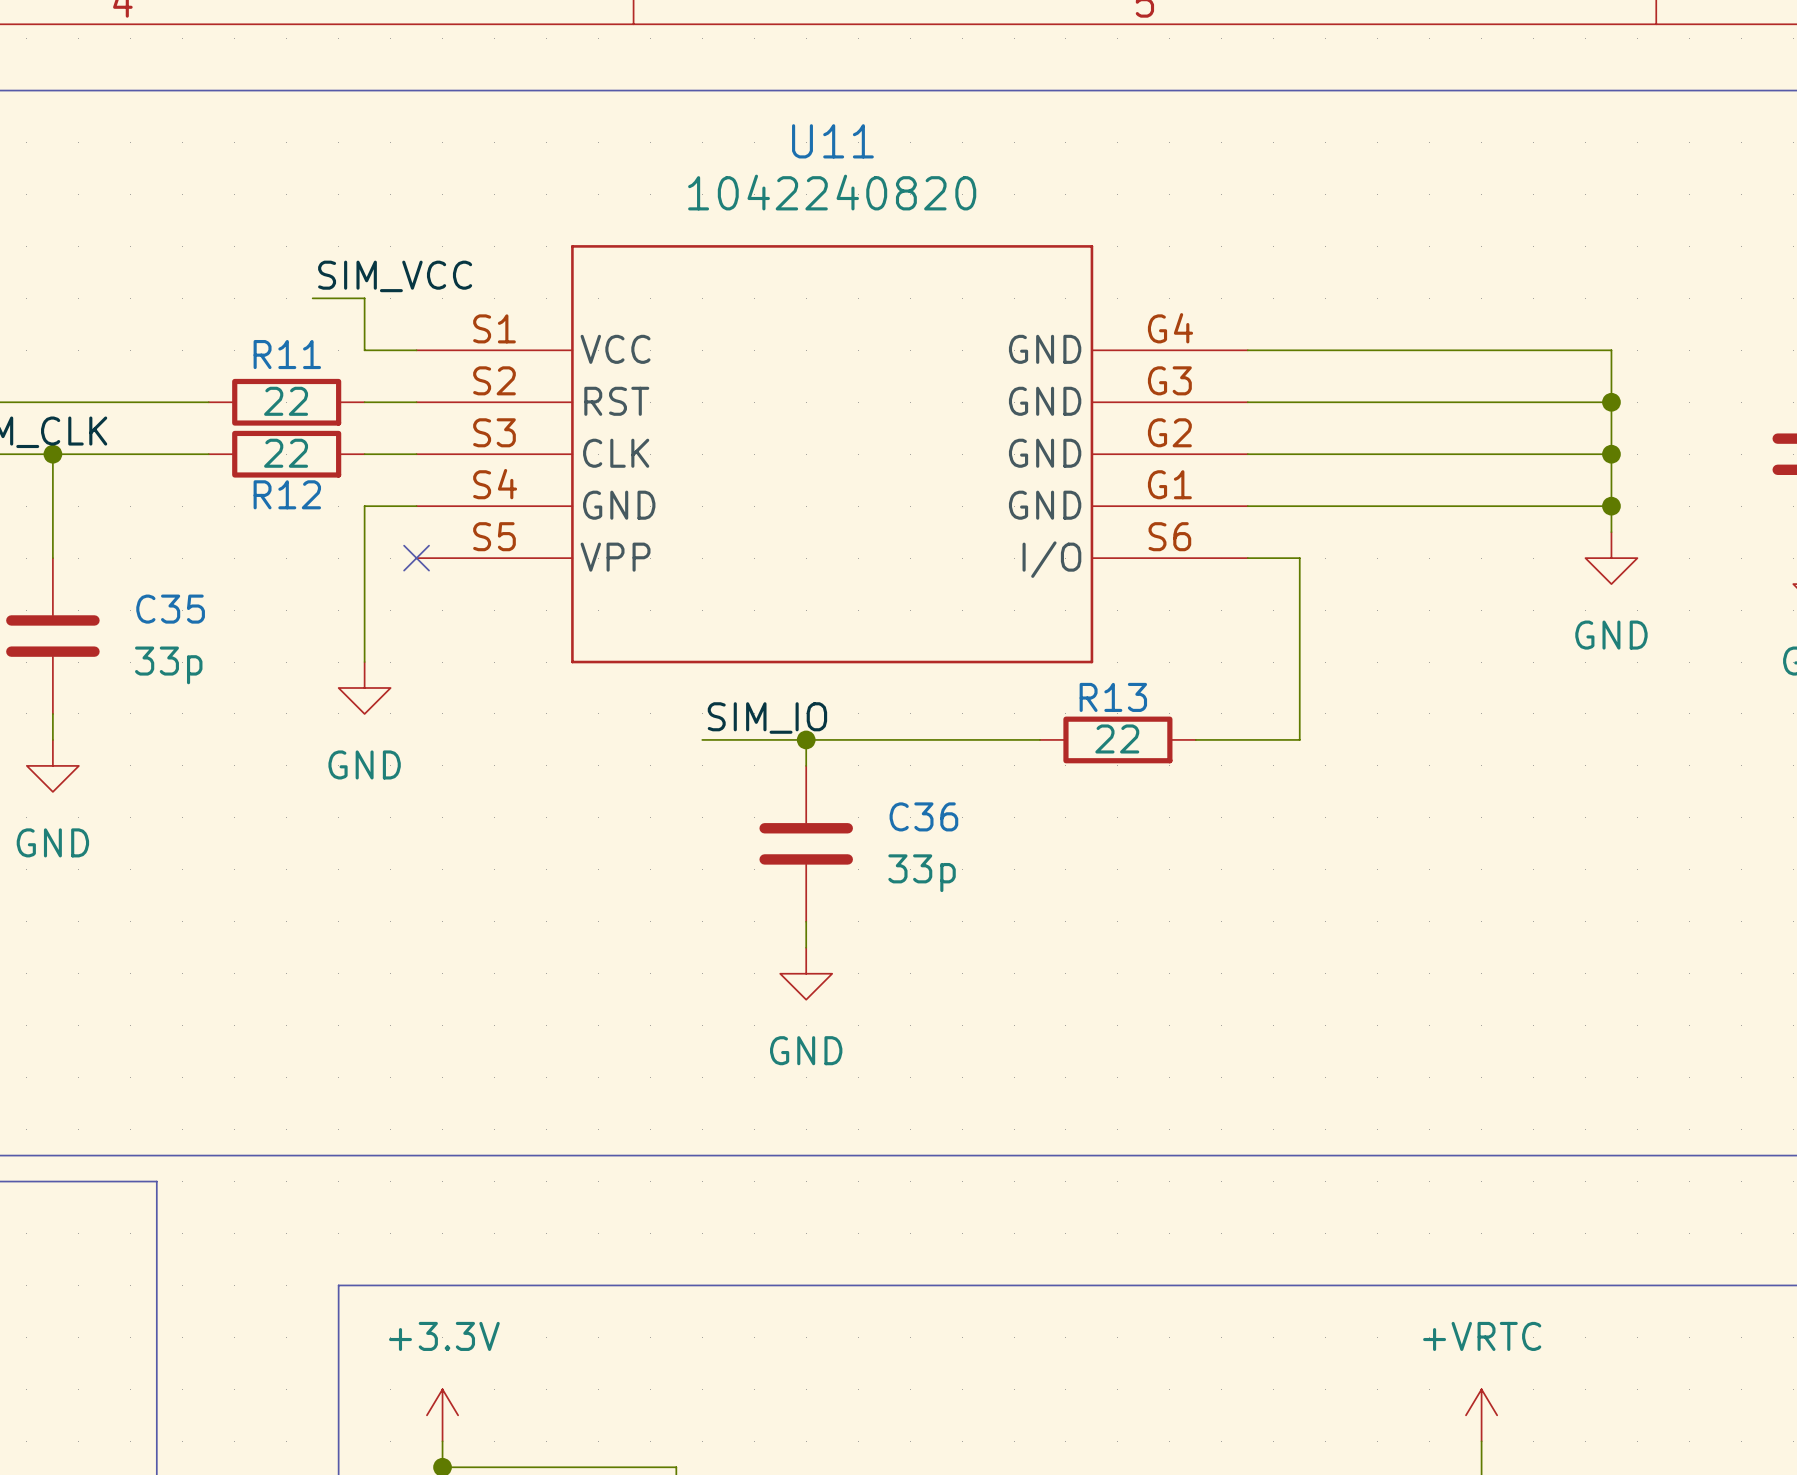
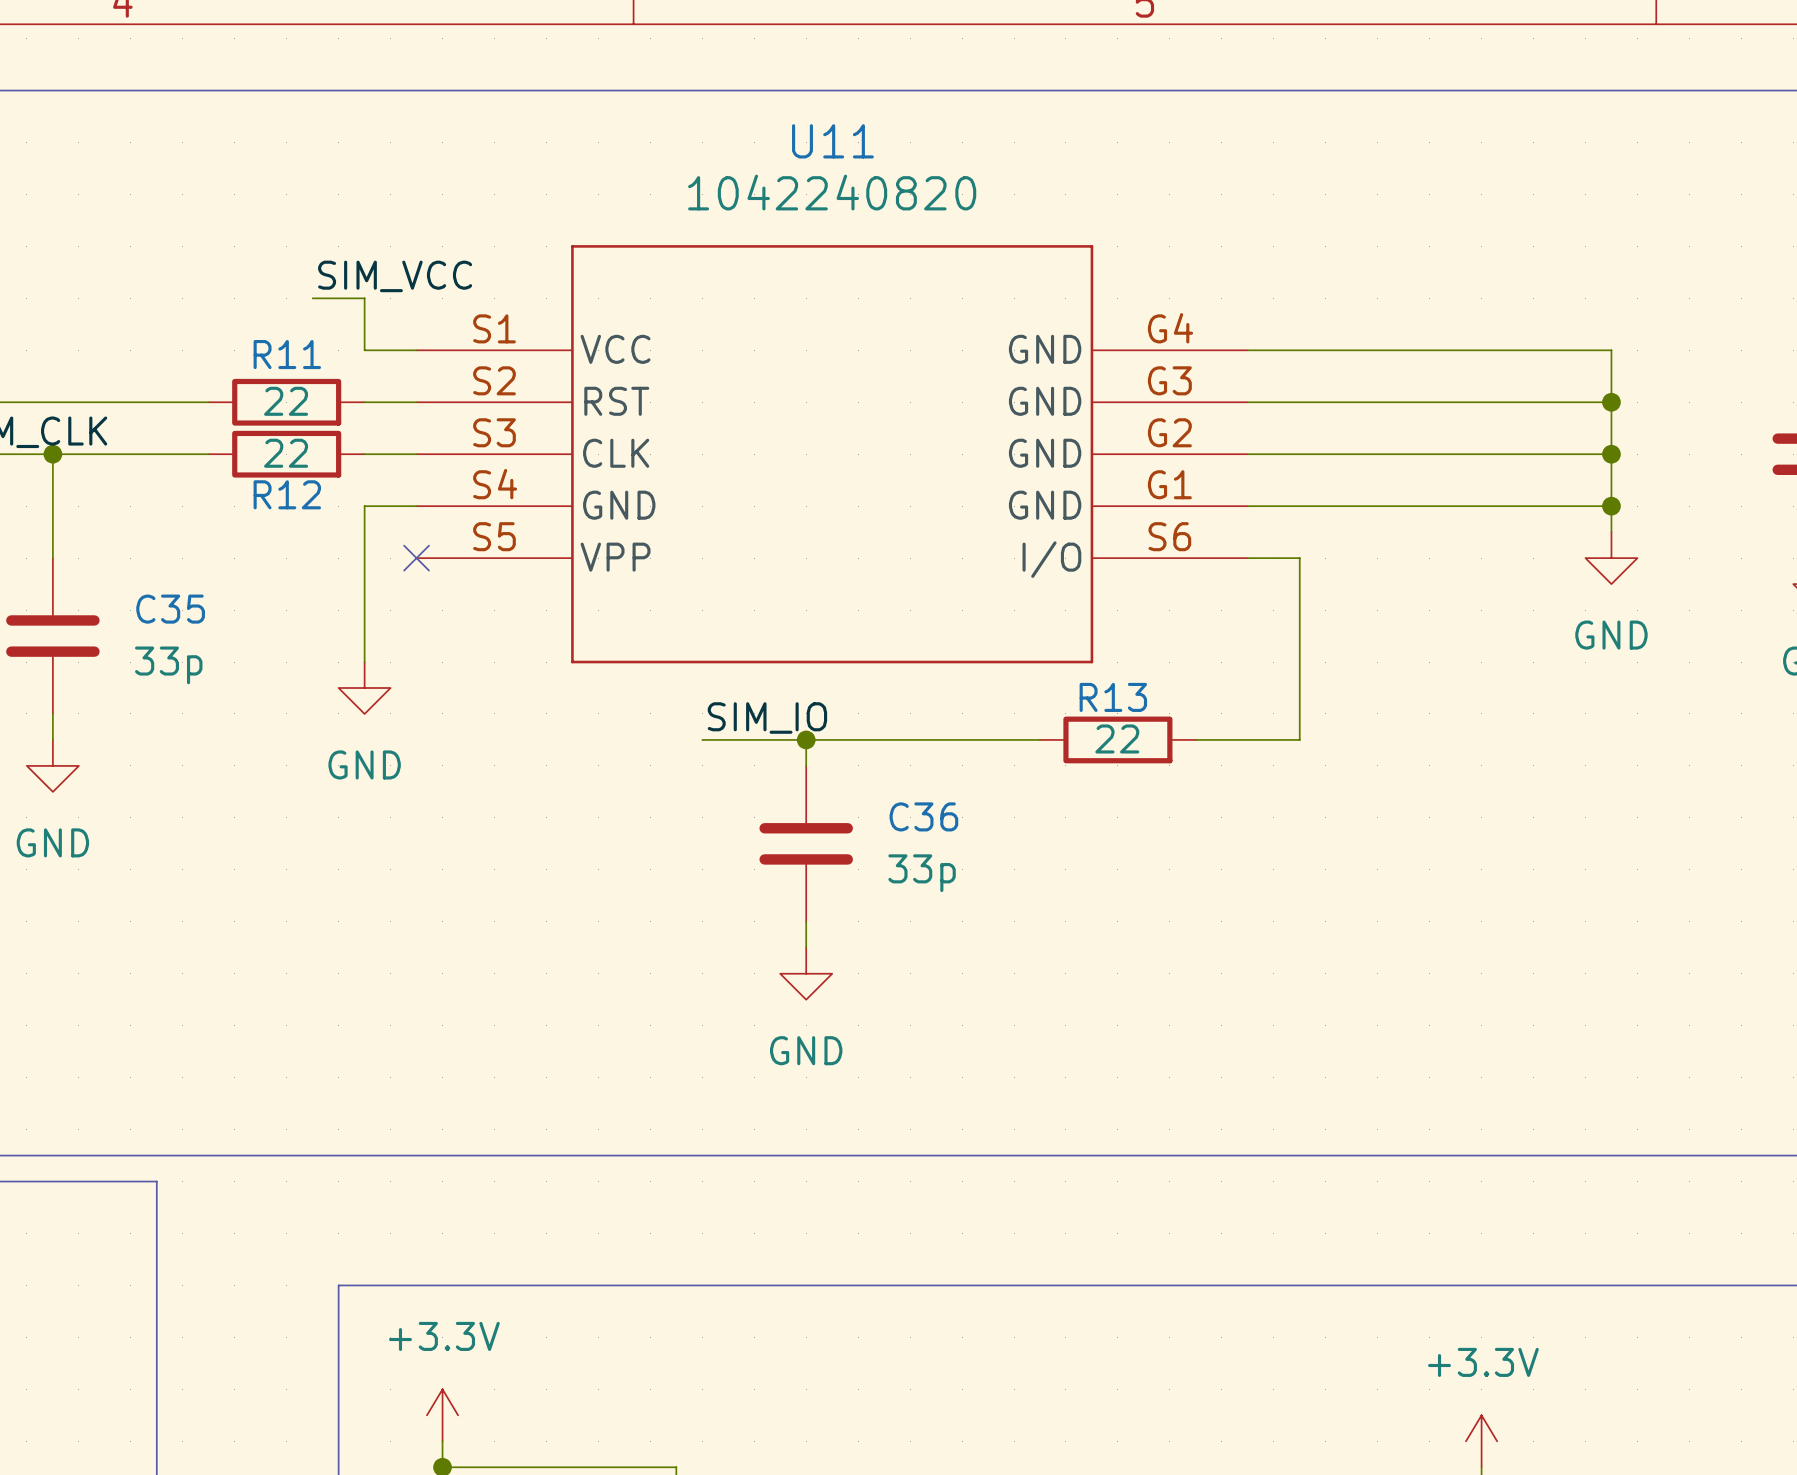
power symbol: +VRTC (1481, 1415) -> none
power symbol: none -> +3.3V (1481, 1441)

